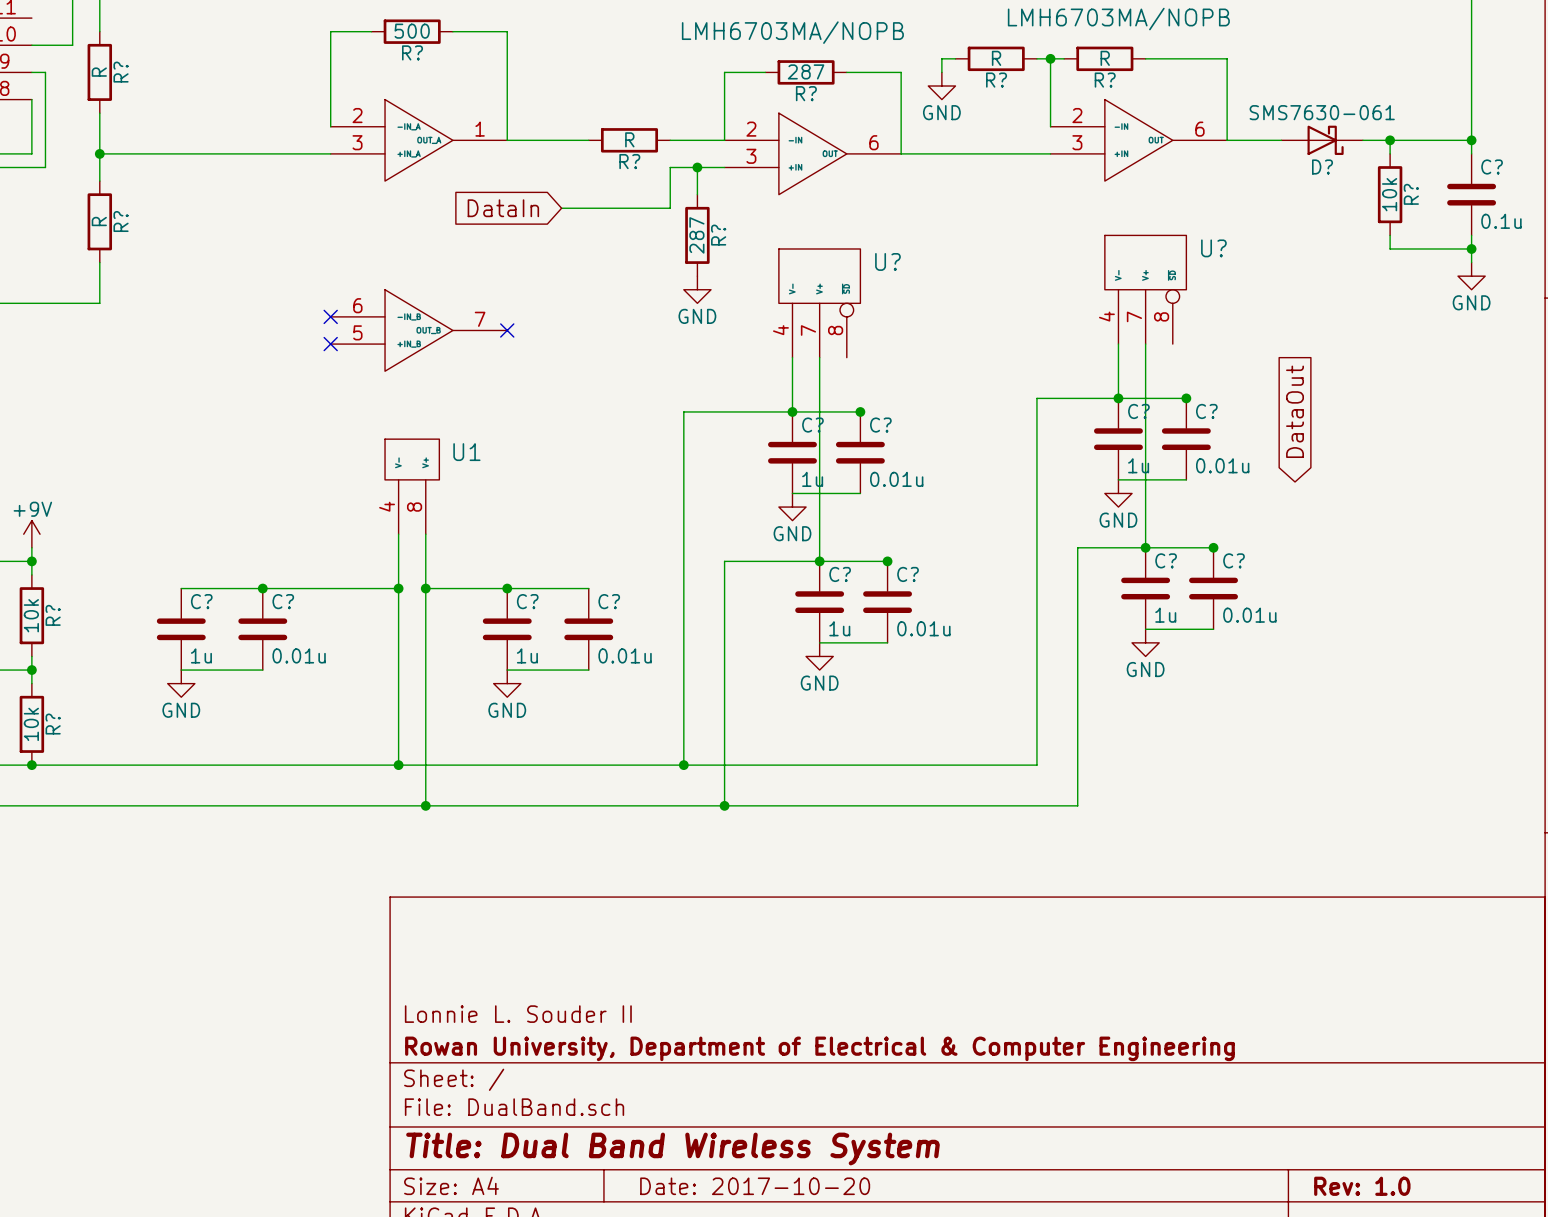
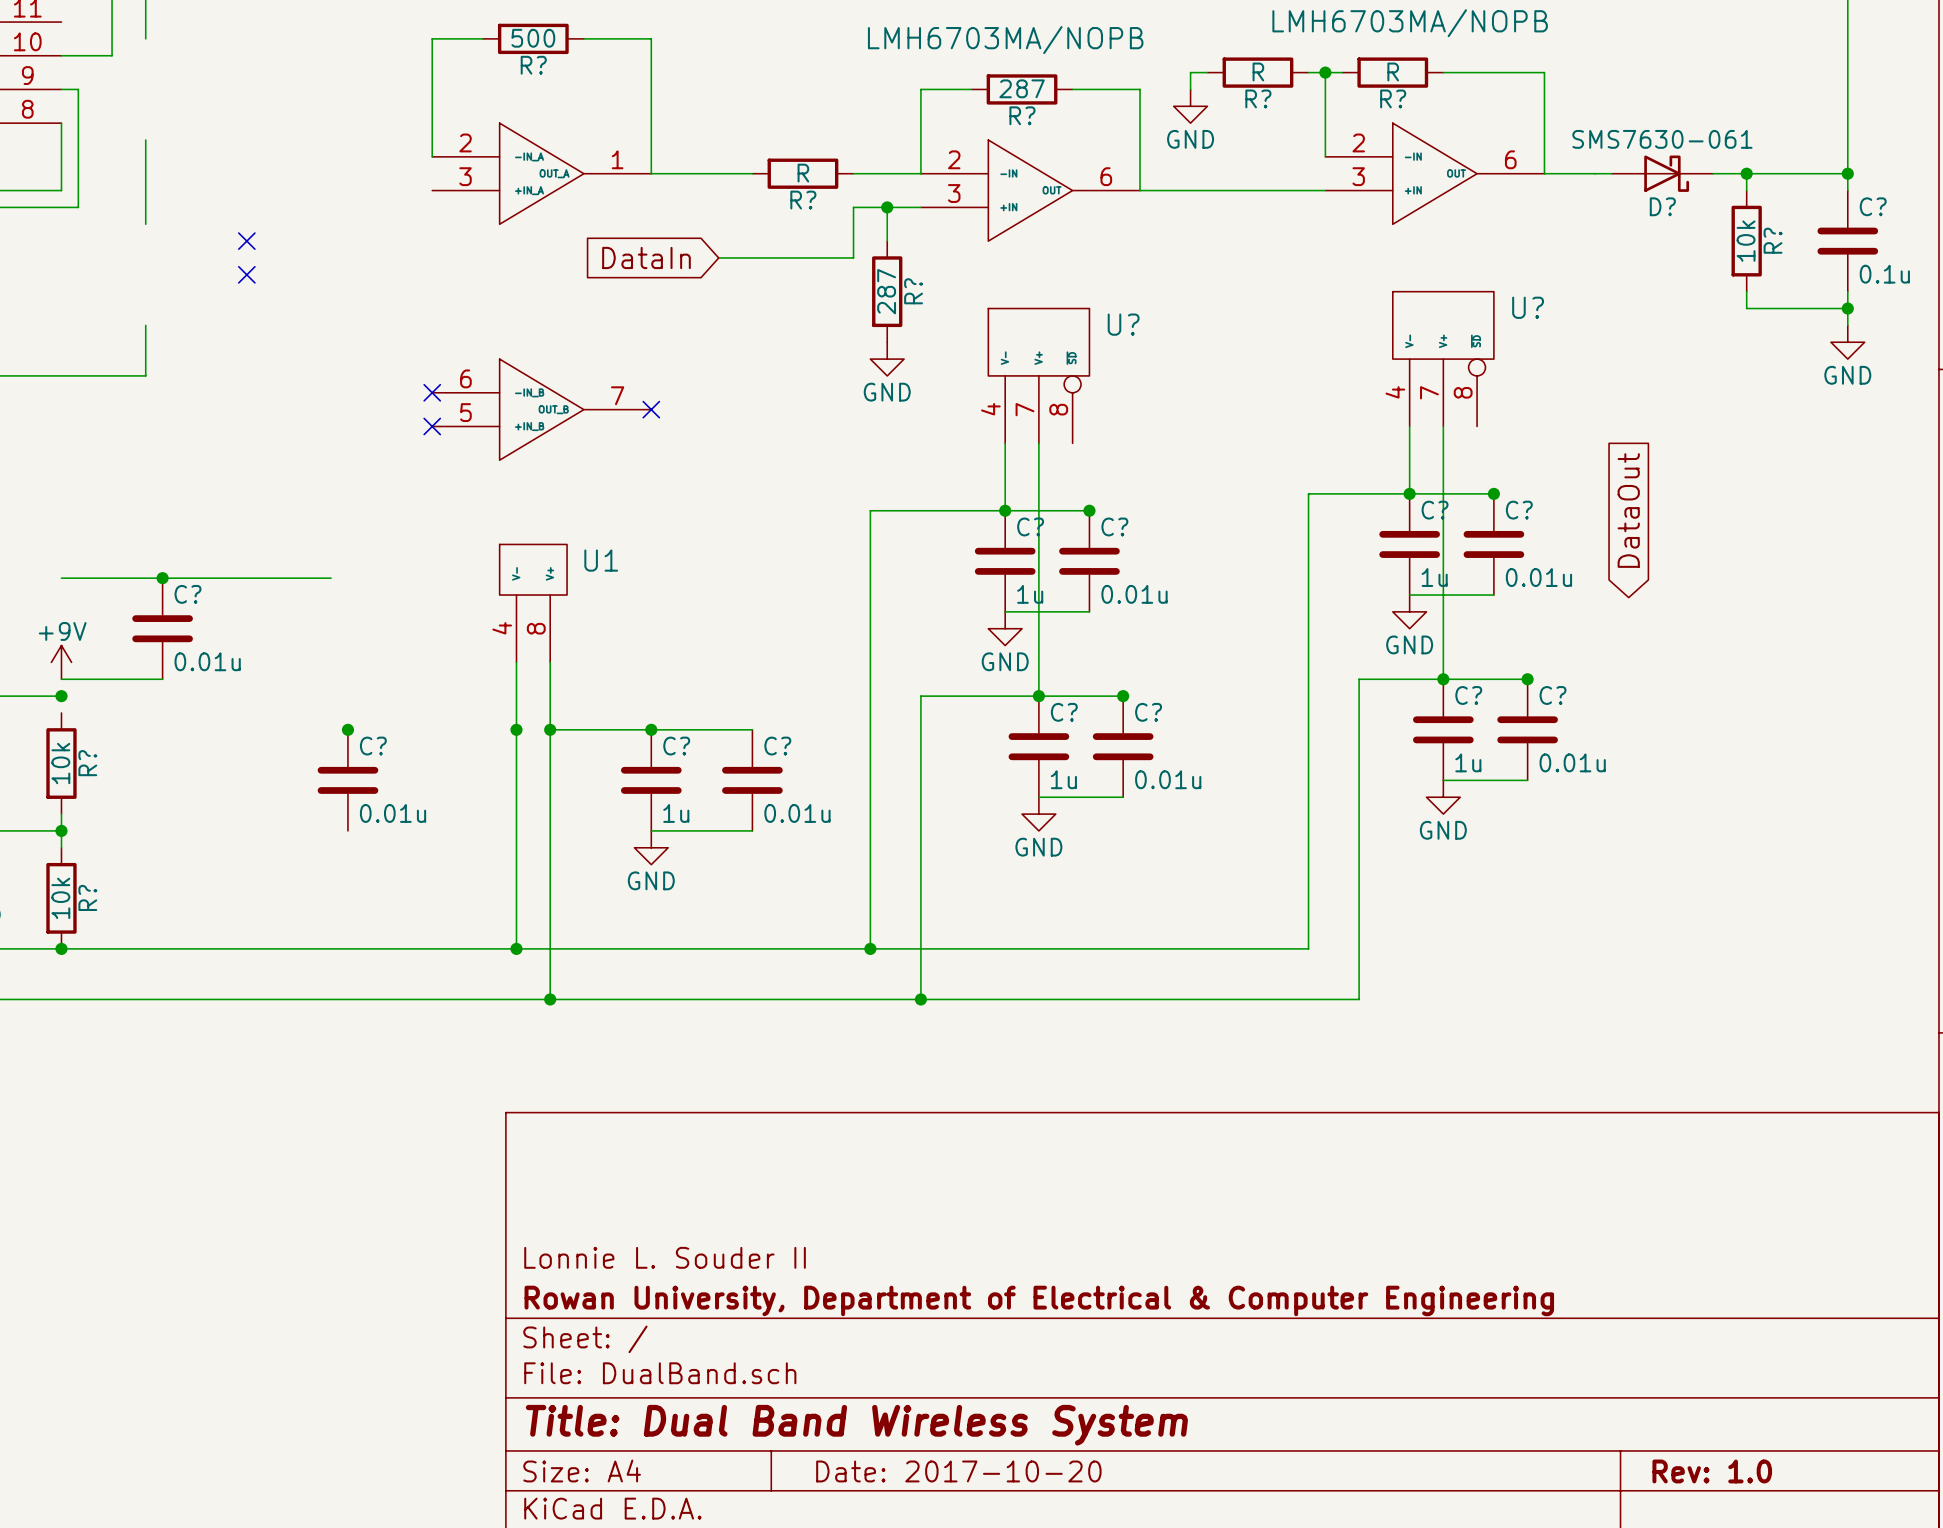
R?: R (99, 72) -> none
wire: (99, 153) (330, 153) -> none
junction: (99, 153) -> none
no-connect mark: none -> (246, 241)
R?: R (99, 221) -> none
no-connect mark: none -> (246, 274)
junction: none -> (162, 578)
C?: none -> 0.01u (162, 628)
wire: (31, 547) (31, 574) -> (61, 679) (162, 679)
wire: (181, 588) (398, 588) -> (61, 578) (331, 578)
C?: 1u (181, 629) -> none
wire: (181, 670) (262, 670) -> none
power symbol: GND (181, 683) -> none

